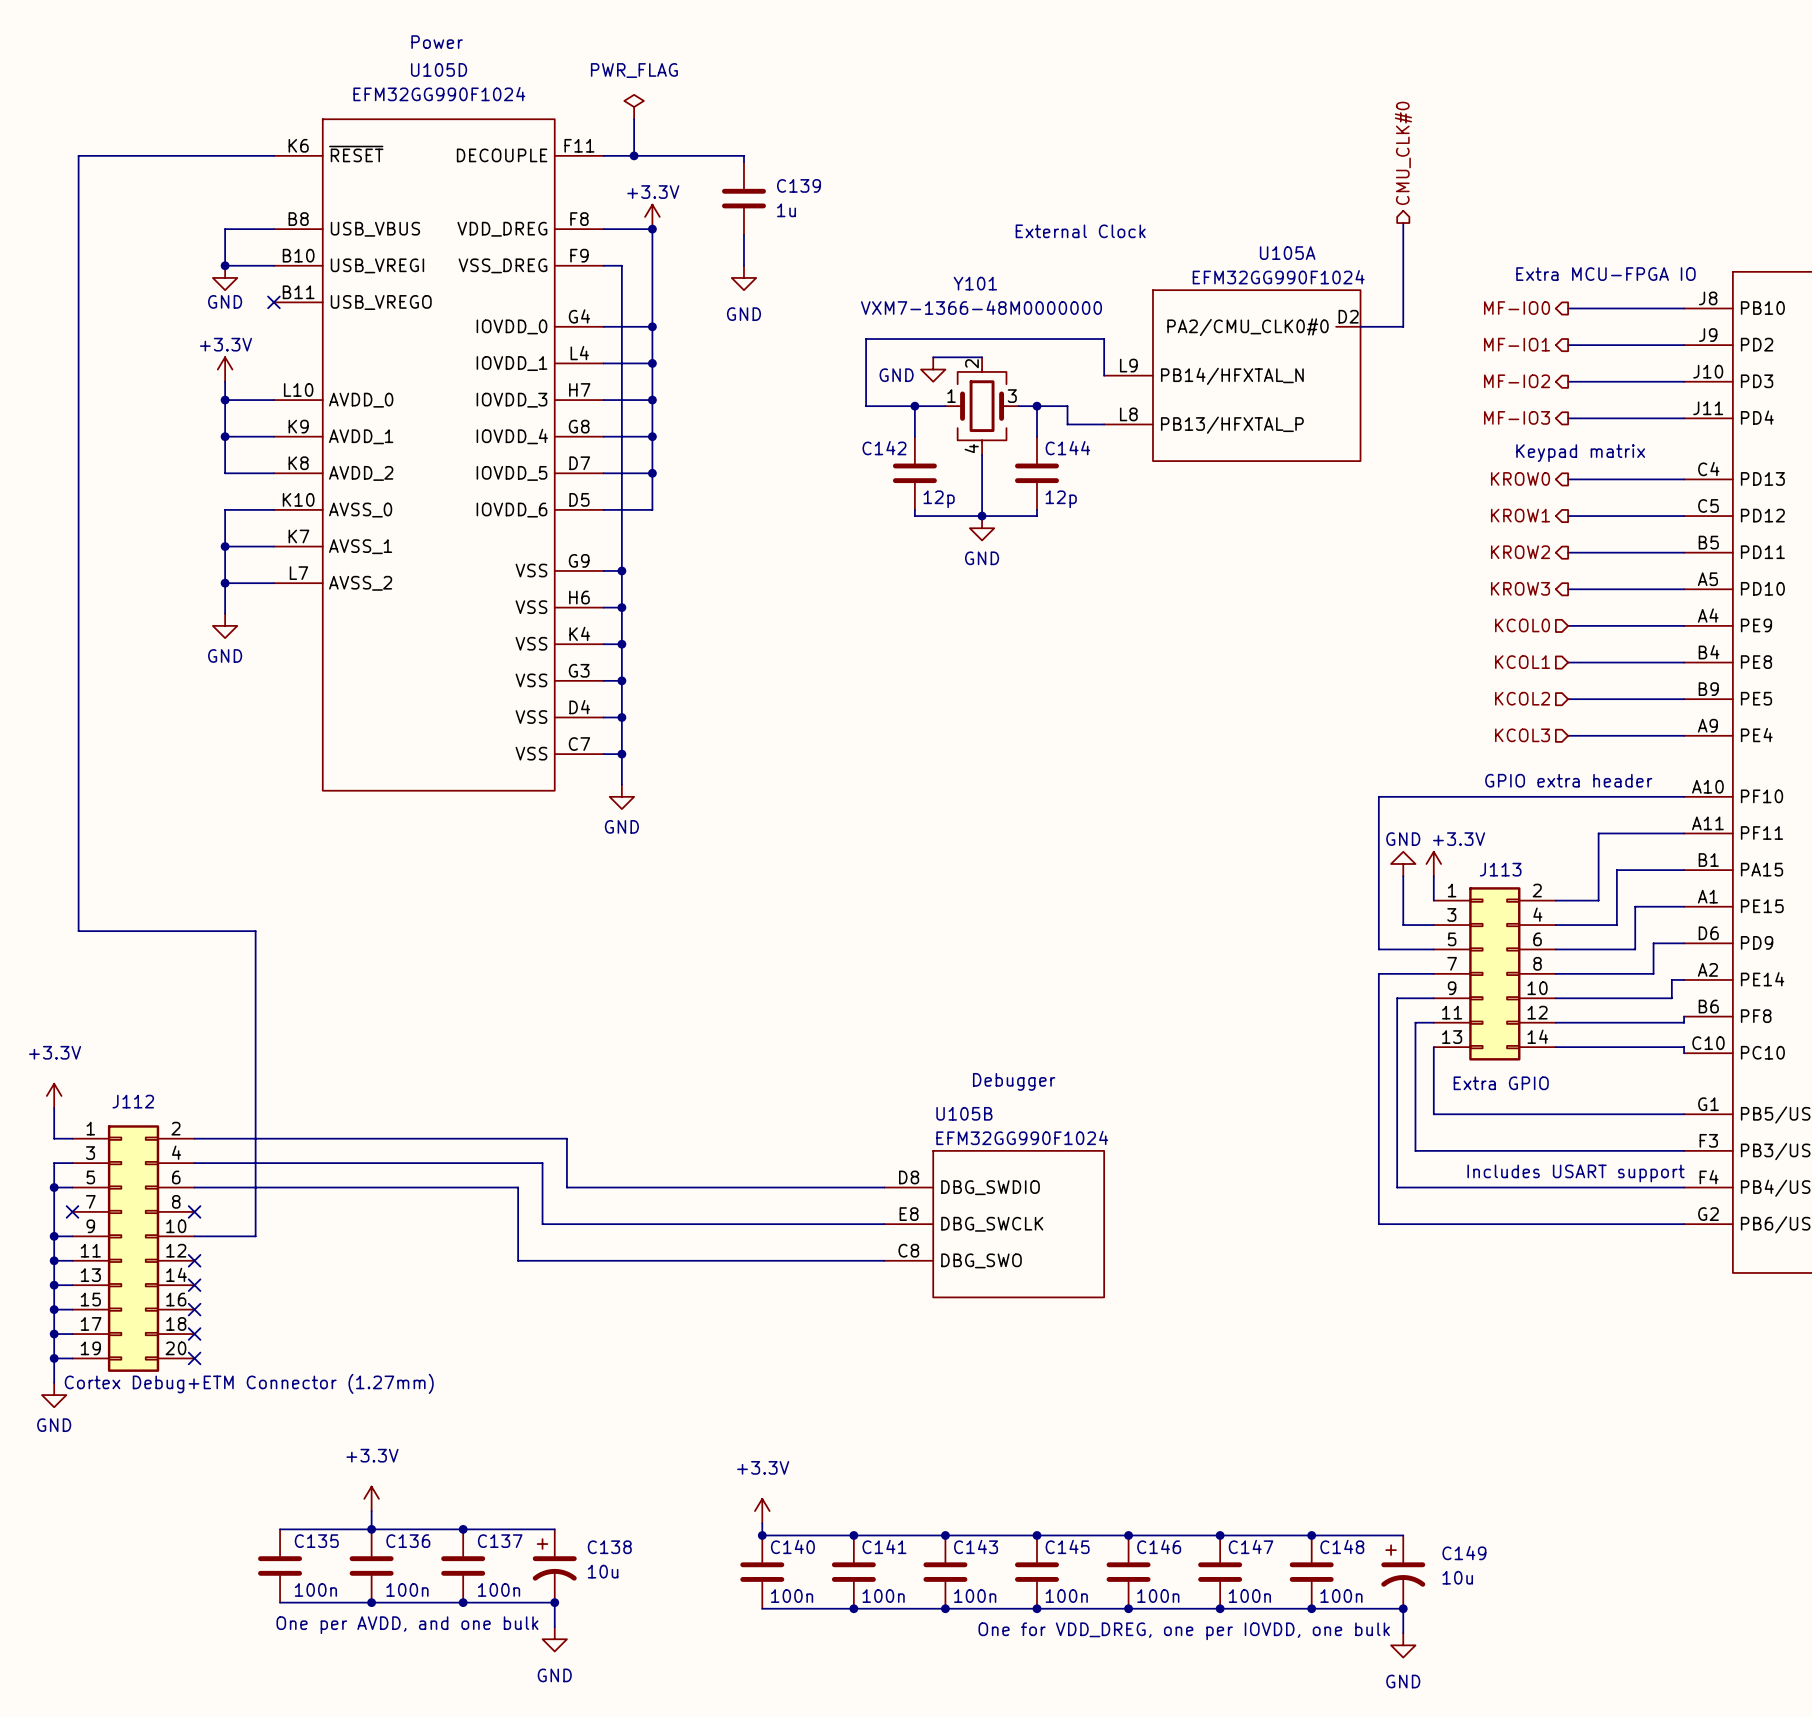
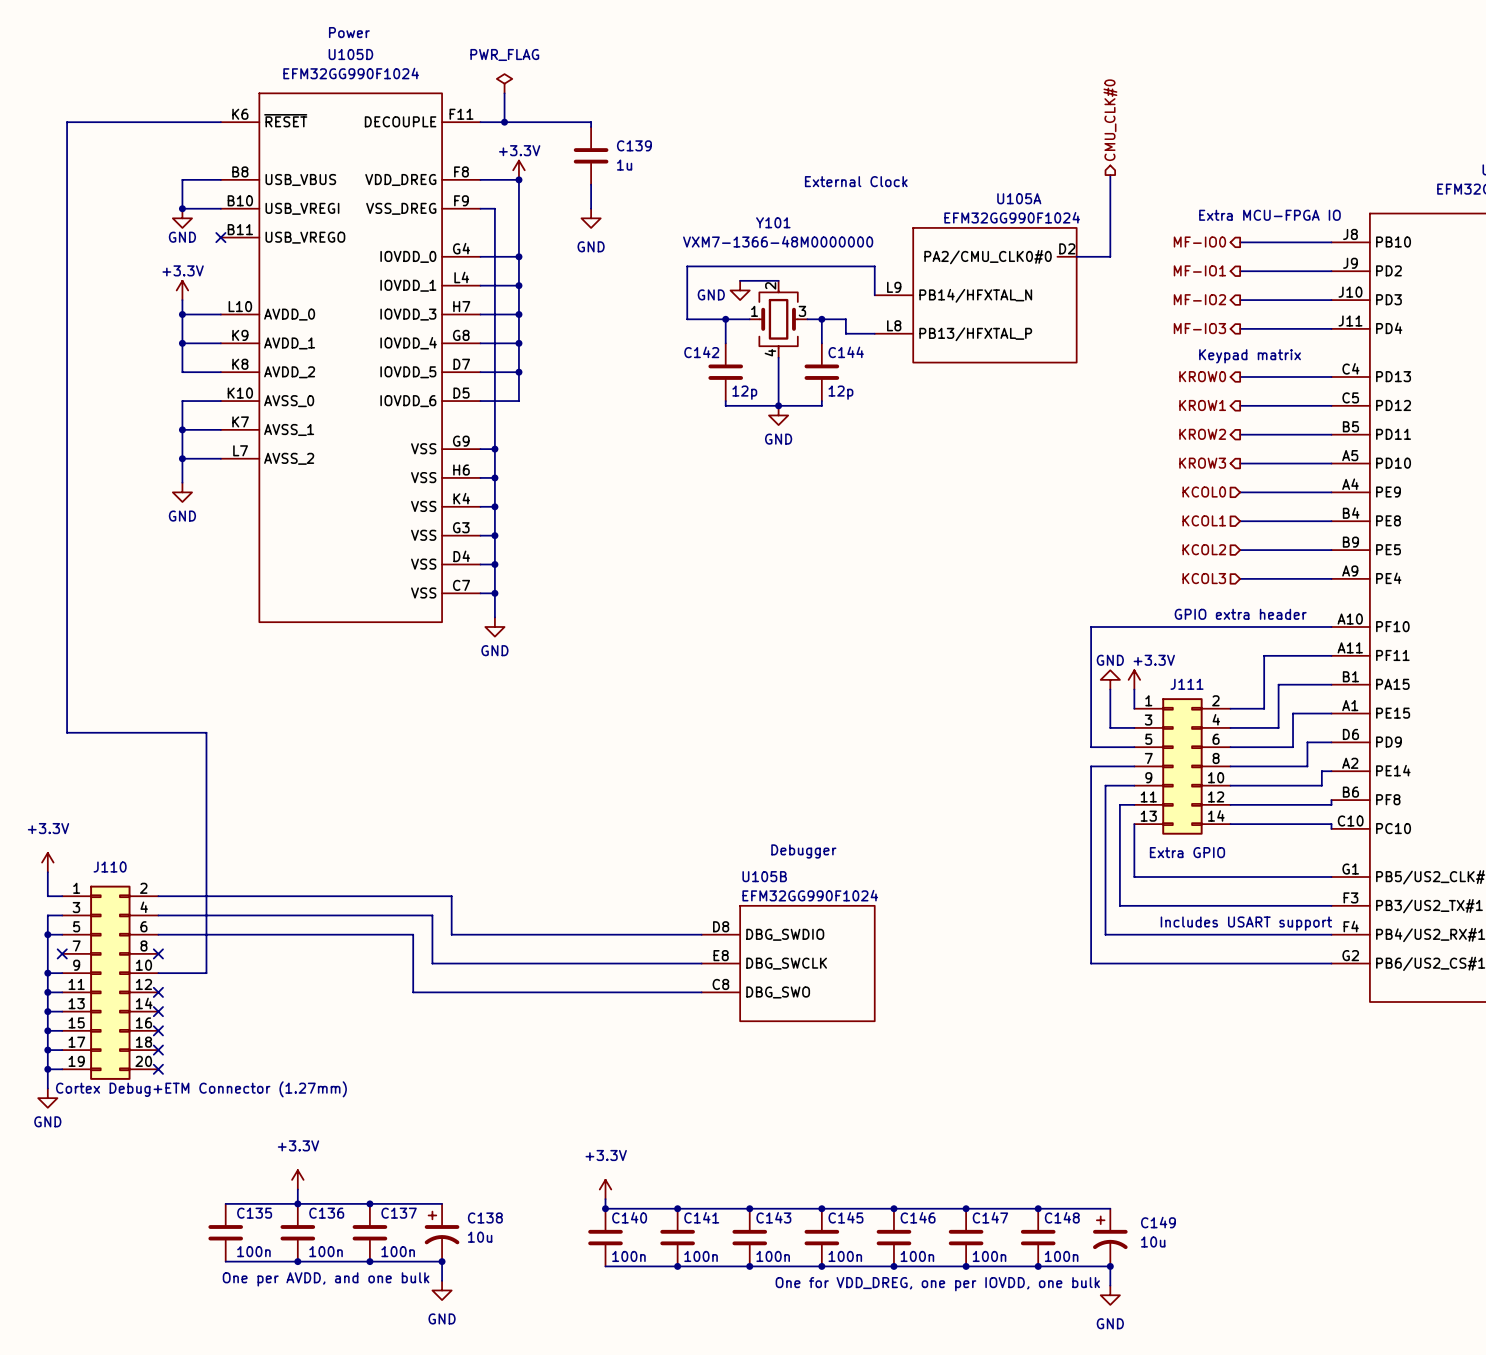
J113 name: J113 (1500, 869) -> J111 (1187, 684)
J112 name: J112 (133, 1101) -> J110 (110, 867)

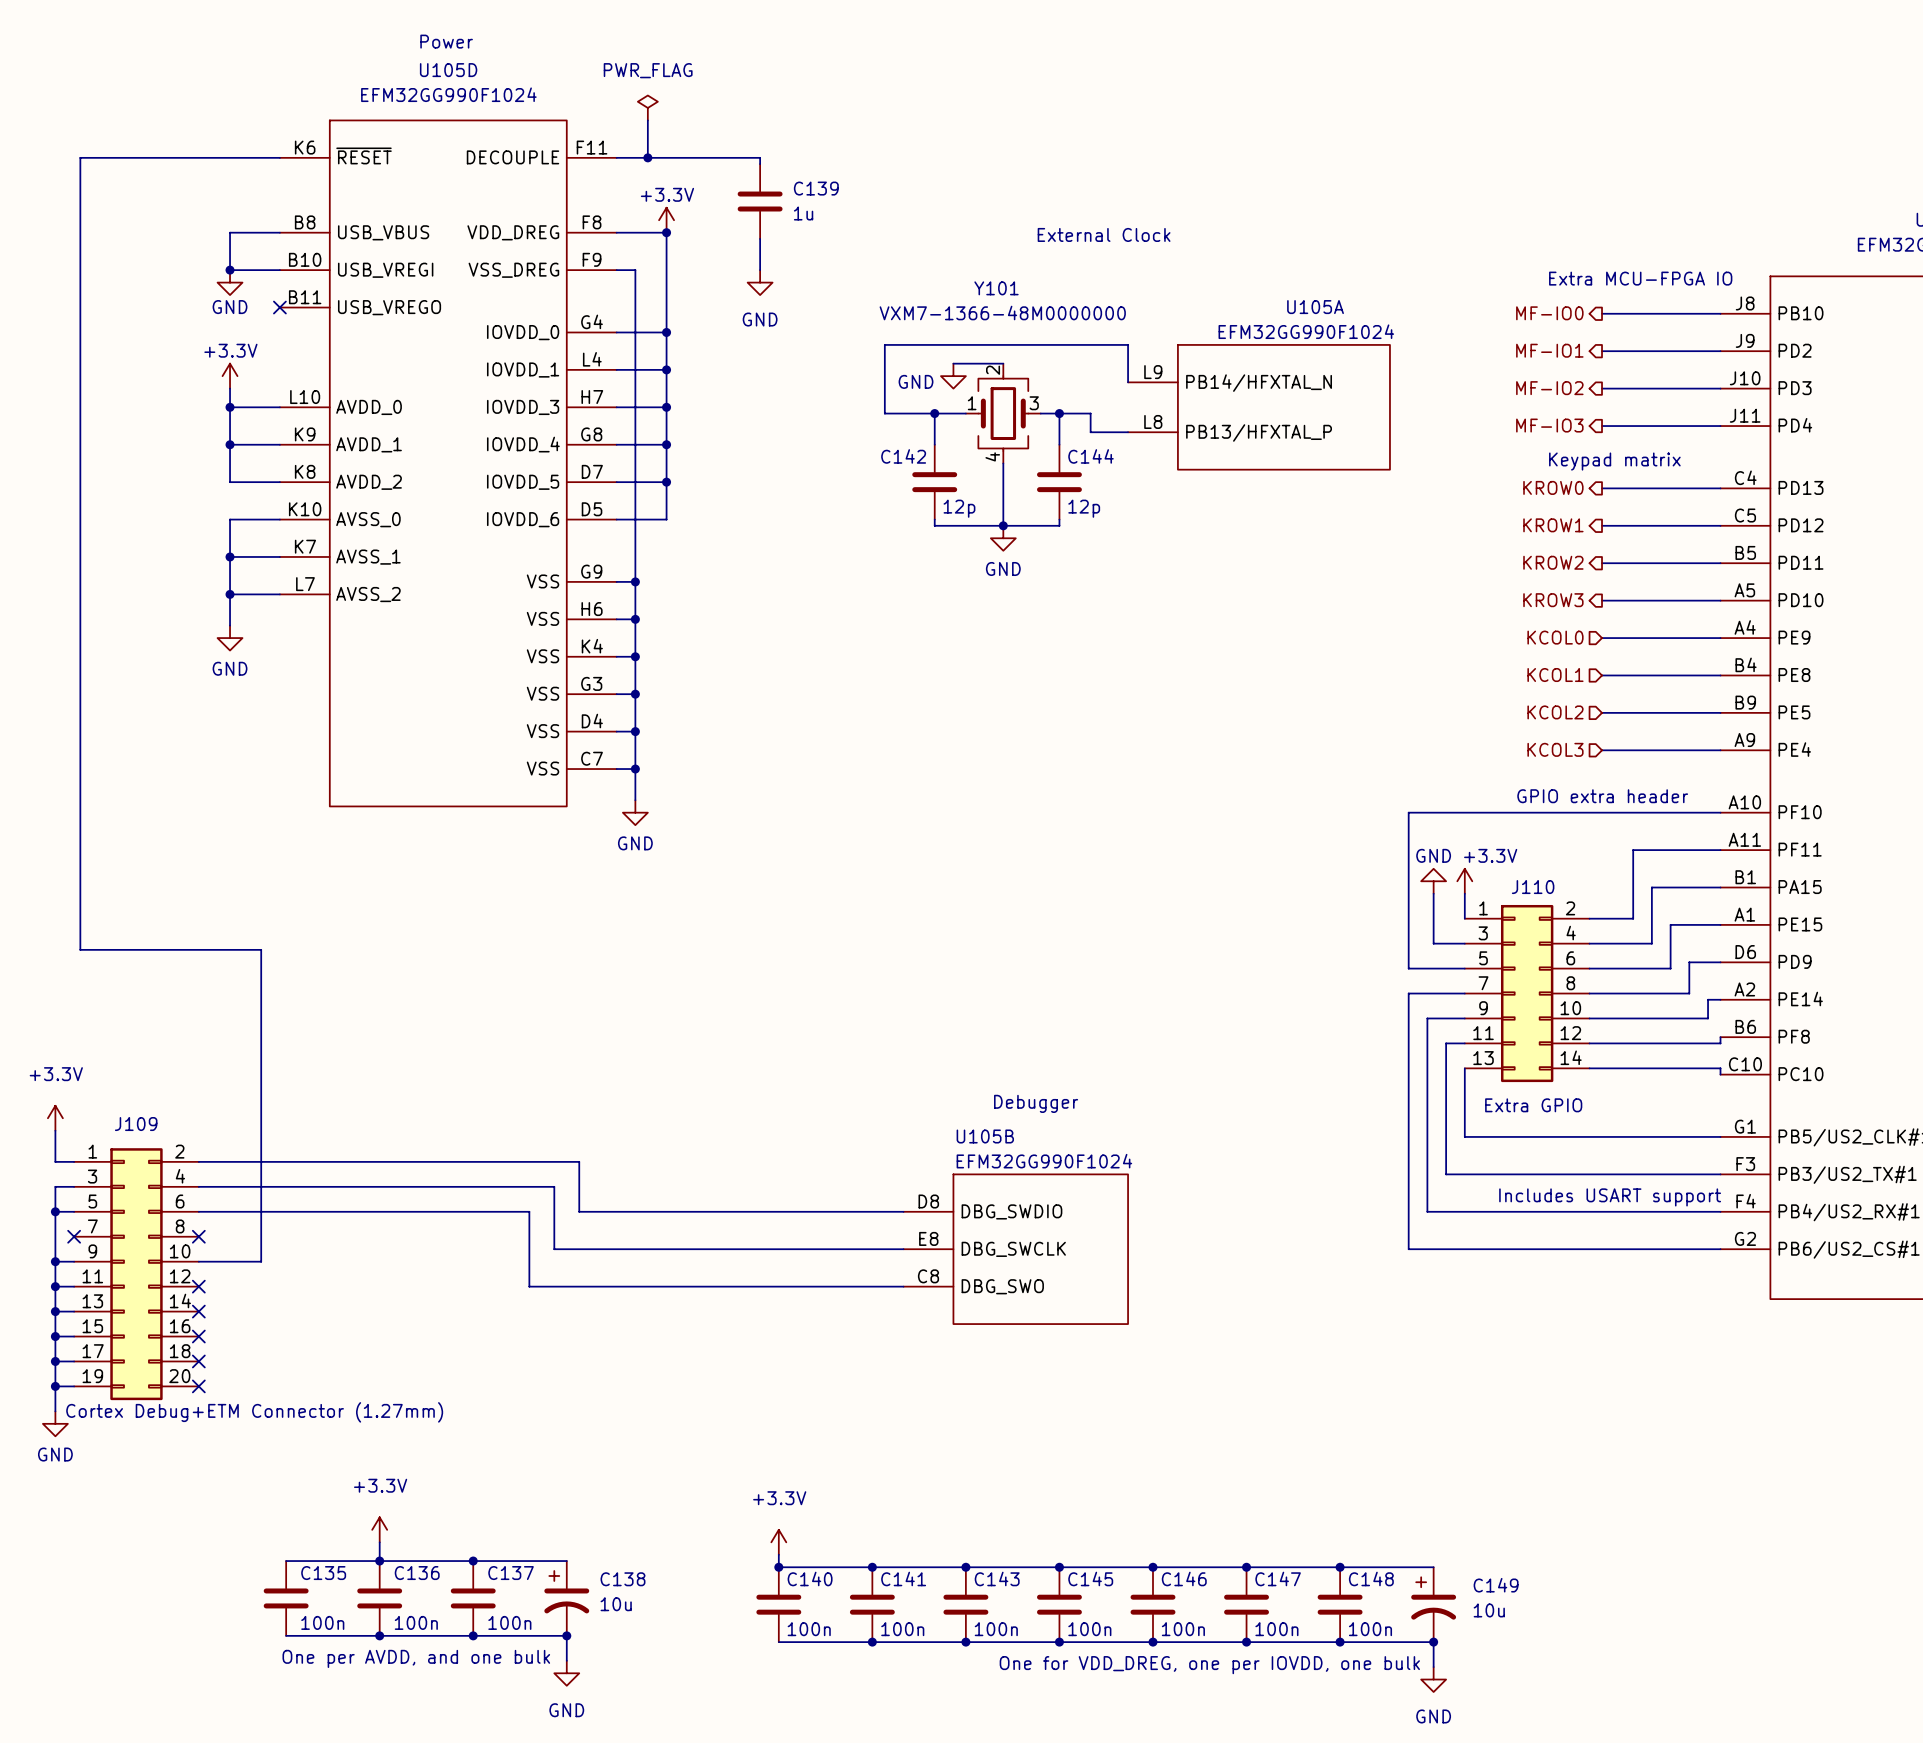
hierarchical label: CMU_CLK#0 (1110, 120) -> none
wire: (1110, 175) (1110, 256) (1076, 256) -> none
U105A name position: U105A (1019, 198) -> U105A (1315, 307)
U105A value position: EFM32GG990F1024 (1012, 217) -> EFM32GG990F1024 (1306, 331)
U105A symbol: [874, 227, 1077, 363] -> [1128, 344, 1390, 470]
J111 name: J111 (1187, 684) -> J110 (1533, 887)
J110 name: J110 (110, 867) -> J109 (136, 1124)

